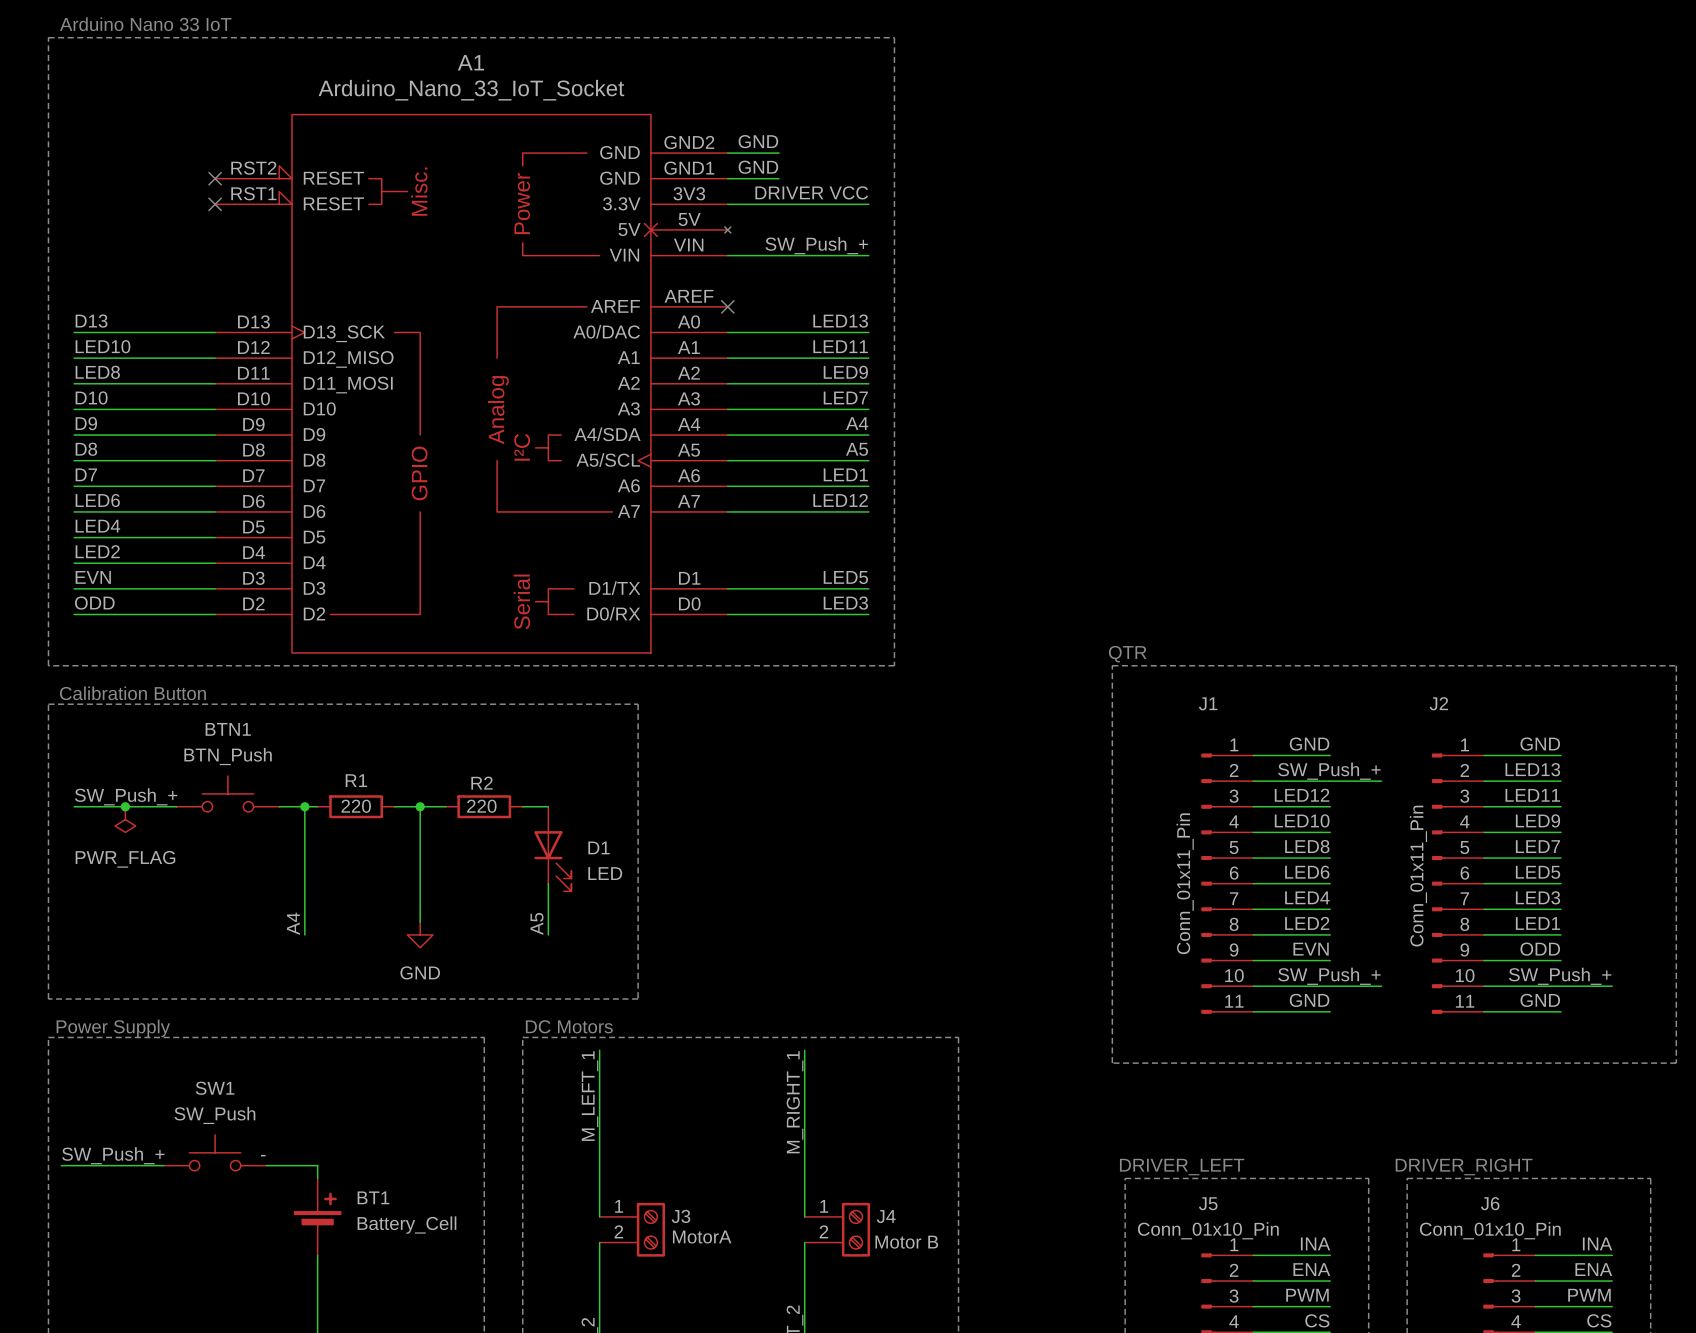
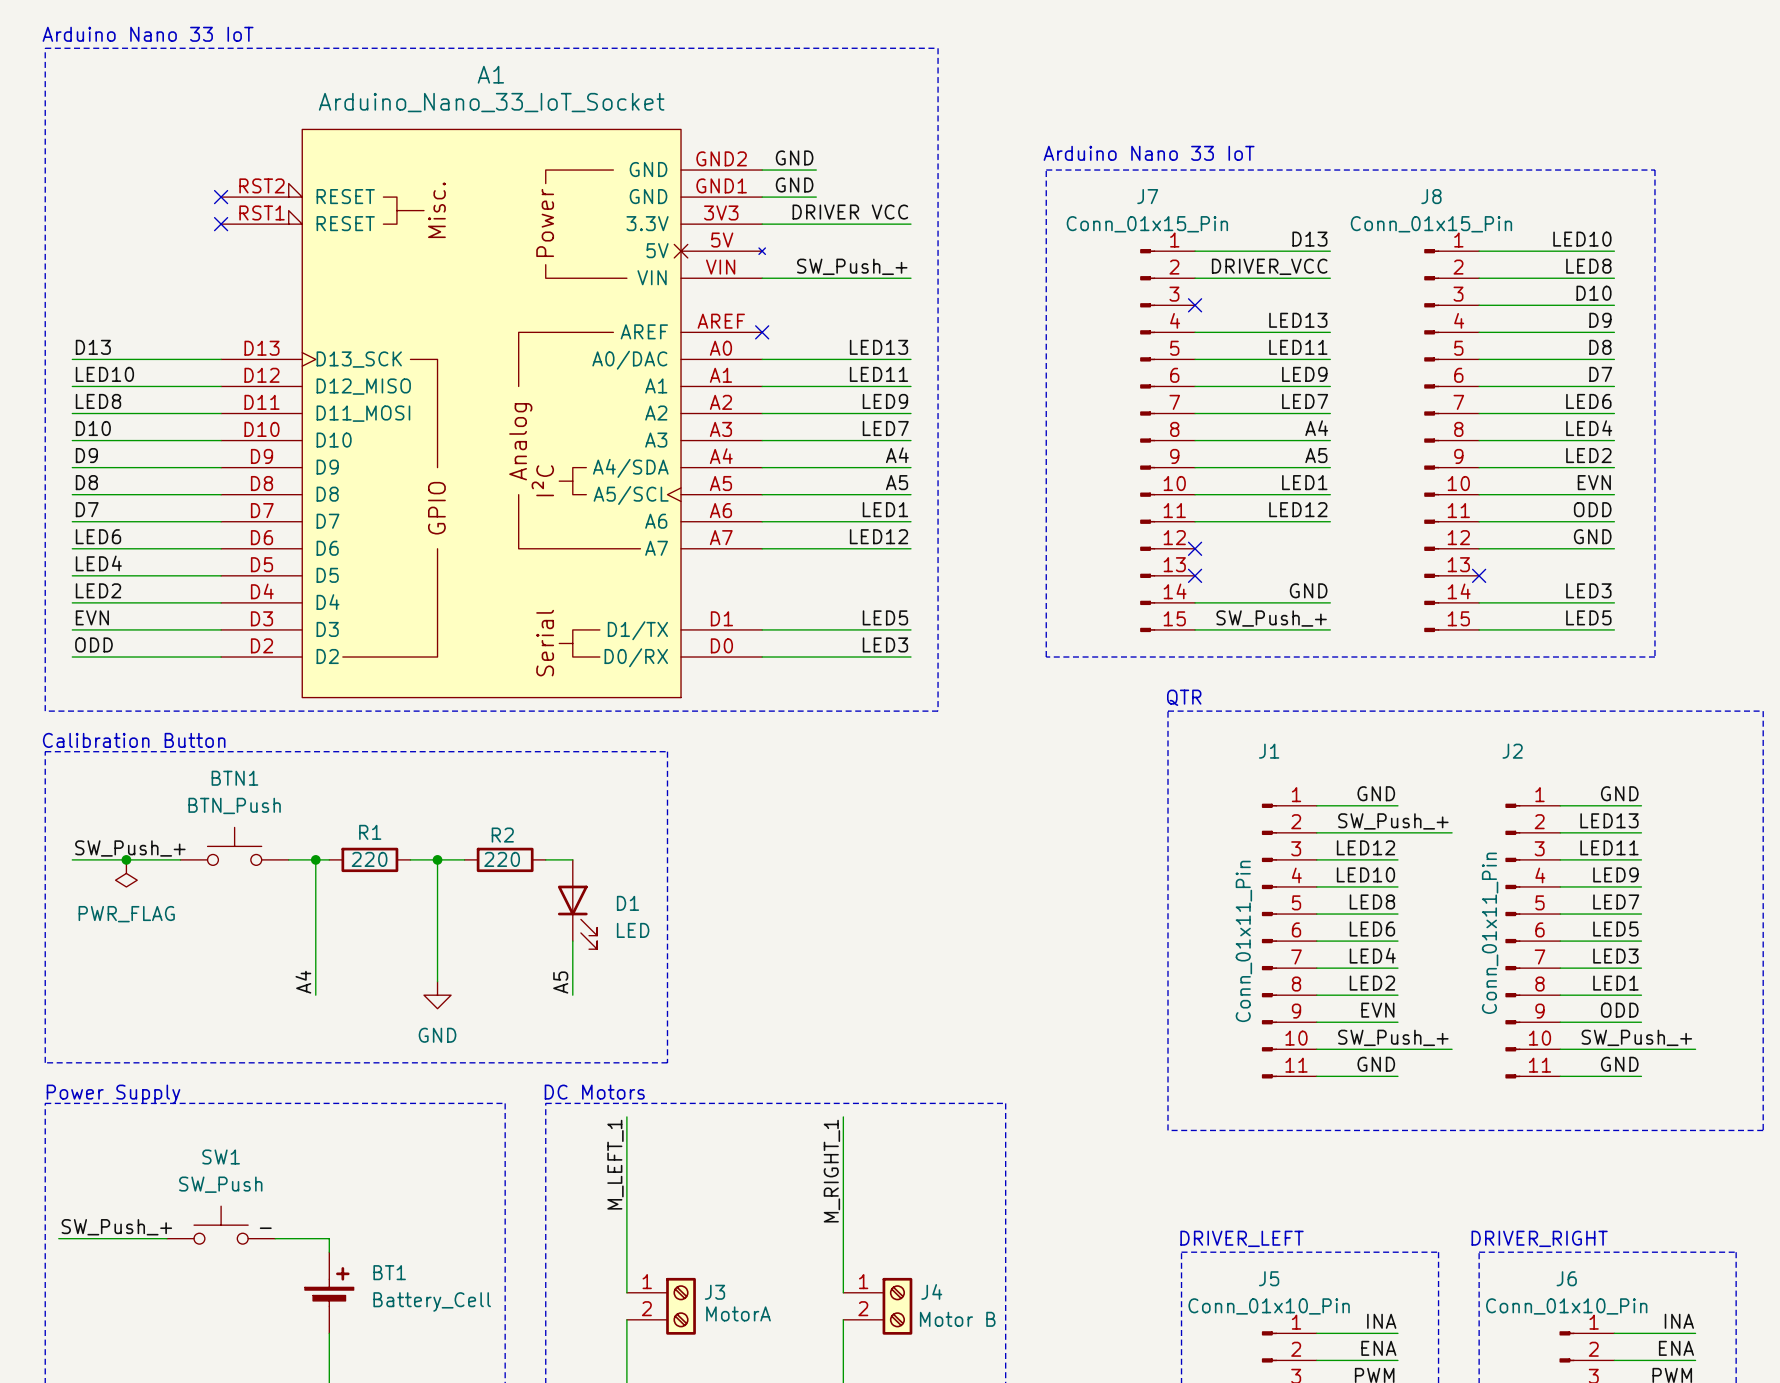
text: none -> Arduino Nano 33 IoT (1149, 153)
line: none -> (1046, 170) (1654, 170) (1654, 657) (1046, 657) (1046, 170)
label: none -> D13 (1309, 239)
label: none -> LED10 (1582, 239)
wire: none -> (1195, 251) (1330, 251)
wire: none -> (1479, 251) (1614, 251)
label: none -> LED8 (1588, 266)
label: none -> DRIVER_VCC (1269, 266)
wire: none -> (1195, 278) (1330, 278)
wire: none -> (1479, 278) (1614, 278)
label: none -> D10 (1594, 293)
no-connect mark: none -> (1195, 305)
wire: none -> (1479, 305) (1614, 305)
label: none -> LED13 (1298, 320)
label: none -> D9 (1600, 320)
wire: none -> (1195, 332) (1330, 332)
wire: none -> (1479, 332) (1614, 332)
label: none -> LED11 (1298, 347)
label: none -> D8 (1600, 347)
wire: none -> (1195, 359) (1330, 359)
wire: none -> (1479, 359) (1614, 359)
label: none -> LED9 (1304, 374)
label: none -> D7 (1600, 374)
wire: none -> (1195, 386) (1330, 386)
wire: none -> (1479, 386) (1614, 386)
label: none -> LED7 (1305, 401)
label: none -> LED6 (1588, 401)
wire: none -> (1195, 413) (1330, 413)
wire: none -> (1479, 413) (1614, 413)
label: none -> A4 (1316, 428)
label: none -> LED4 (1589, 428)
J7: none -> Conn_01x15_Pin (1167, 440)
wire: none -> (1195, 440) (1330, 440)
J8: none -> Conn_01x15_Pin (1451, 440)
wire: none -> (1479, 440) (1614, 440)
label: none -> A5 (1316, 455)
label: none -> LED2 (1588, 455)
wire: none -> (1195, 467) (1330, 467)
wire: none -> (1479, 467) (1614, 467)
label: none -> LED1 (1304, 482)
label: none -> EVN (1594, 482)
wire: none -> (1195, 494) (1330, 494)
wire: none -> (1479, 494) (1614, 494)
label: none -> LED12 (1298, 509)
label: none -> ODD (1592, 509)
wire: none -> (1195, 521) (1330, 521)
wire: none -> (1479, 521) (1614, 521)
label: none -> GND (1592, 536)
no-connect mark: none -> (1195, 548)
wire: none -> (1479, 548) (1614, 548)
no-connect mark: none -> (1195, 575)
no-connect mark: none -> (1479, 575)
label: none -> GND (1308, 590)
label: none -> LED3 (1588, 590)
wire: none -> (1195, 602) (1330, 602)
wire: none -> (1479, 602) (1614, 602)
label: none -> LED5 (1588, 617)
label: none -> SW_Push_+ (1271, 618)
wire: none -> (1195, 629) (1330, 629)
wire: none -> (1479, 629) (1614, 629)

